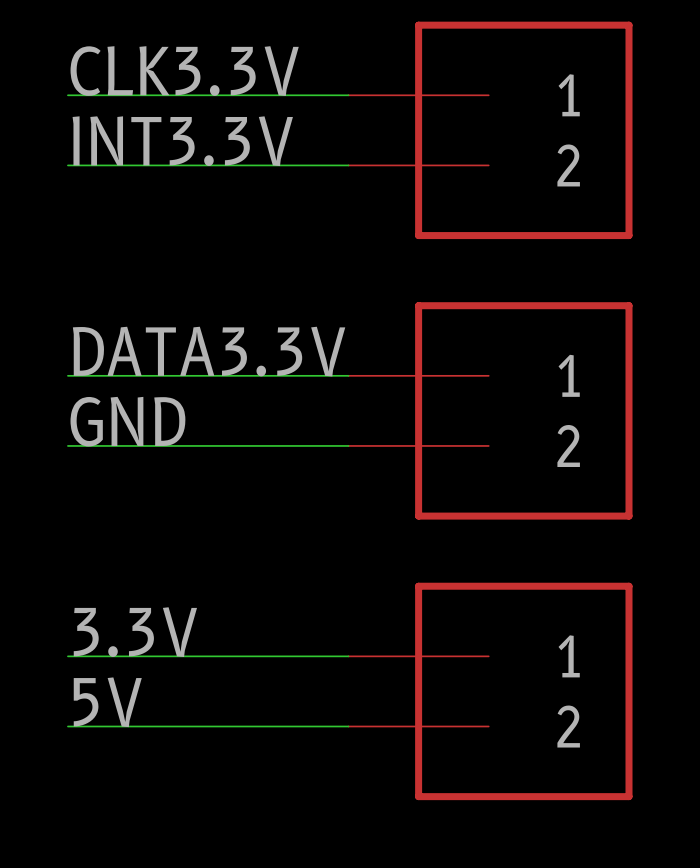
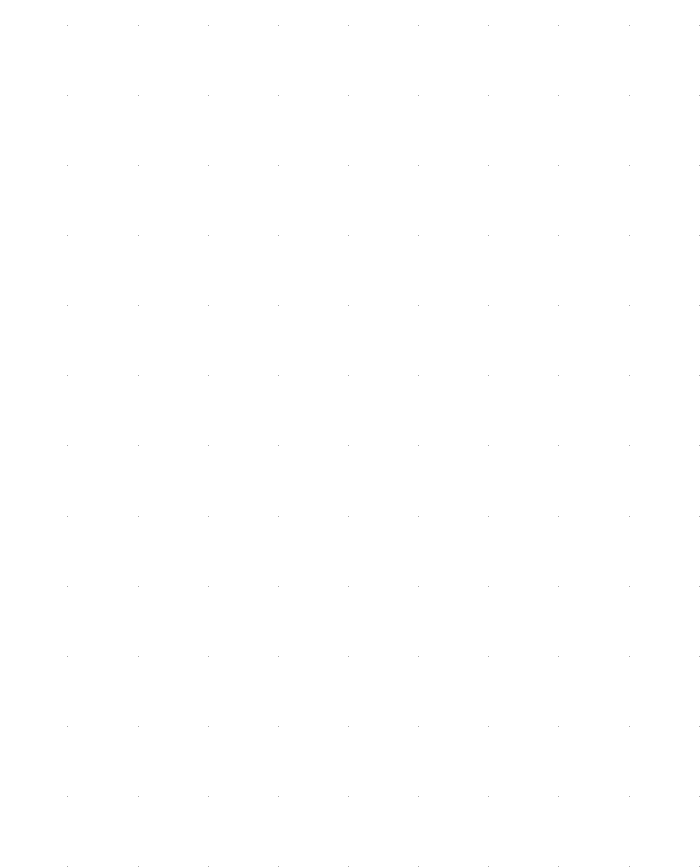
label: CLK3.3V (184, 71) -> none
wire: (67, 95) (348, 95) -> none
part: (490, 130) -> none
label: INT3.3V (182, 141) -> none
wire: (67, 165) (348, 165) -> none
label: DATA3.3V (209, 351) -> none
wire: (67, 375) (348, 375) -> none
part: (490, 410) -> none
label: GND (127, 421) -> none
wire: (67, 445) (348, 445) -> none
label: 3.3V (135, 632) -> none
wire: (67, 656) (348, 656) -> none
part: (490, 691) -> none
label: 5V (107, 702) -> none
wire: (67, 726) (348, 726) -> none

